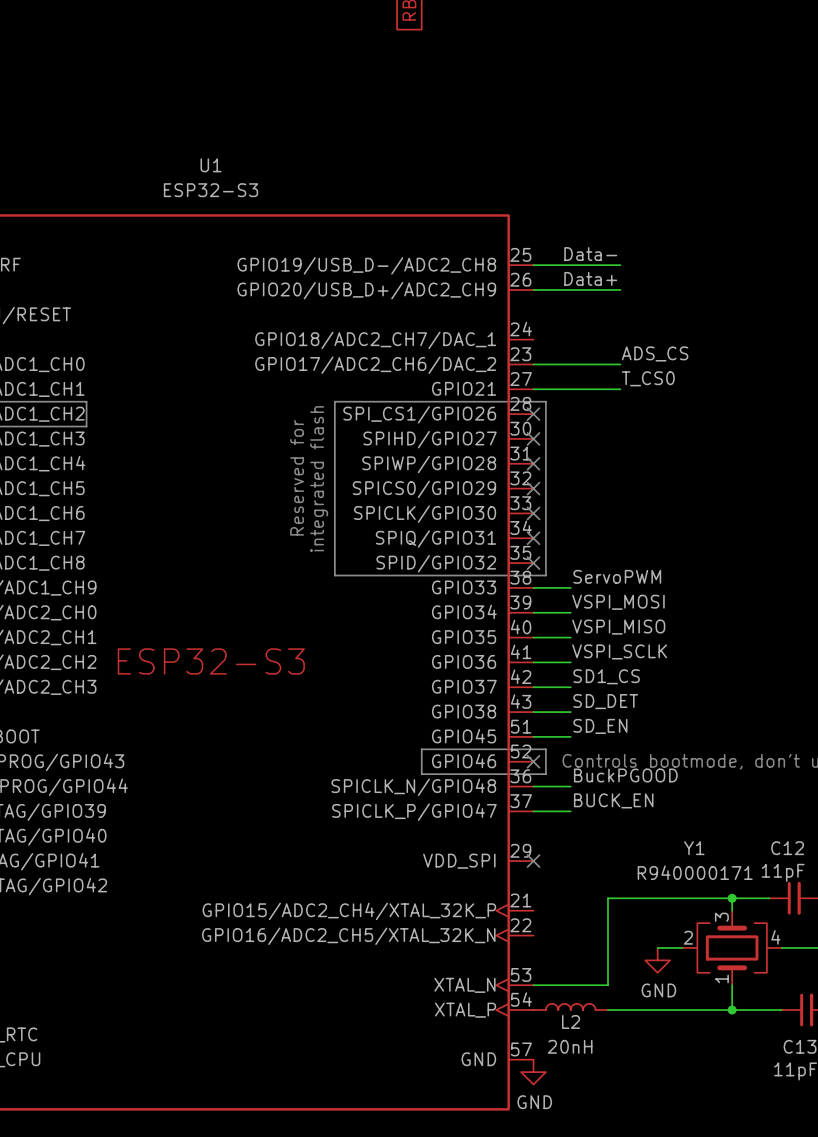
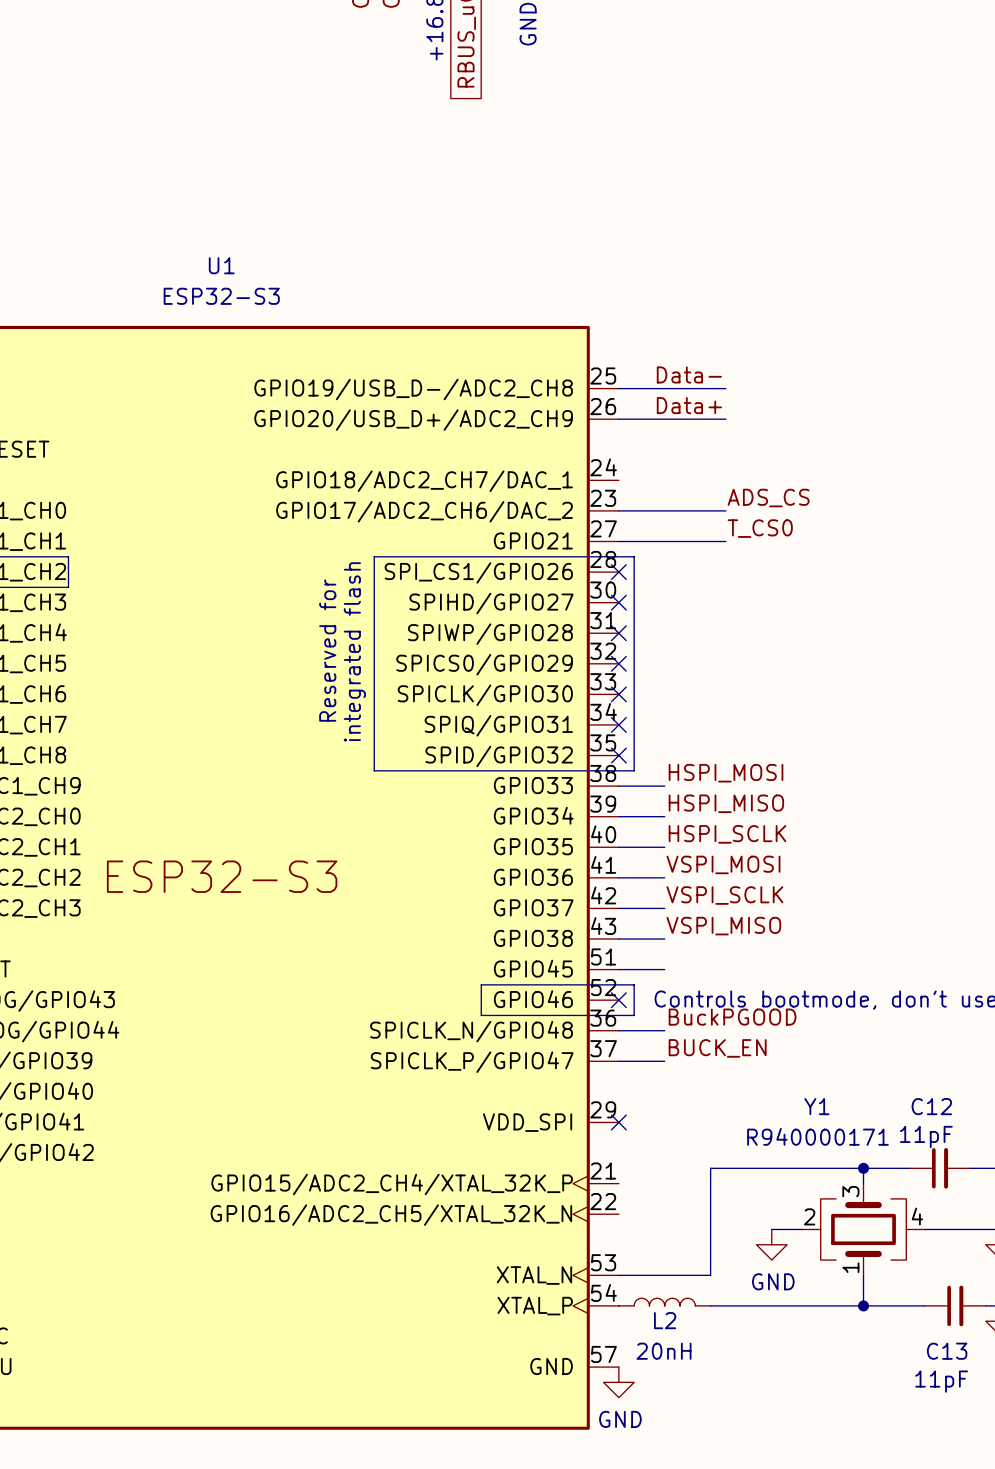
label: ServoPWM (617, 576) -> HSPI_MOSI (726, 773)
label: VSPI_MOSI (618, 602) -> HSPI_MISO (726, 803)
label: VSPI_MISO (618, 627) -> HSPI_SCLK (727, 834)
label: VSPI_SCLK (619, 651) -> VSPI_MOSI (723, 864)
label: SD1_CS (606, 676) -> VSPI_SCLK (724, 895)
label: SD_DET (605, 701) -> VSPI_MISO (723, 926)
label: SD_EN (600, 726) -> none

